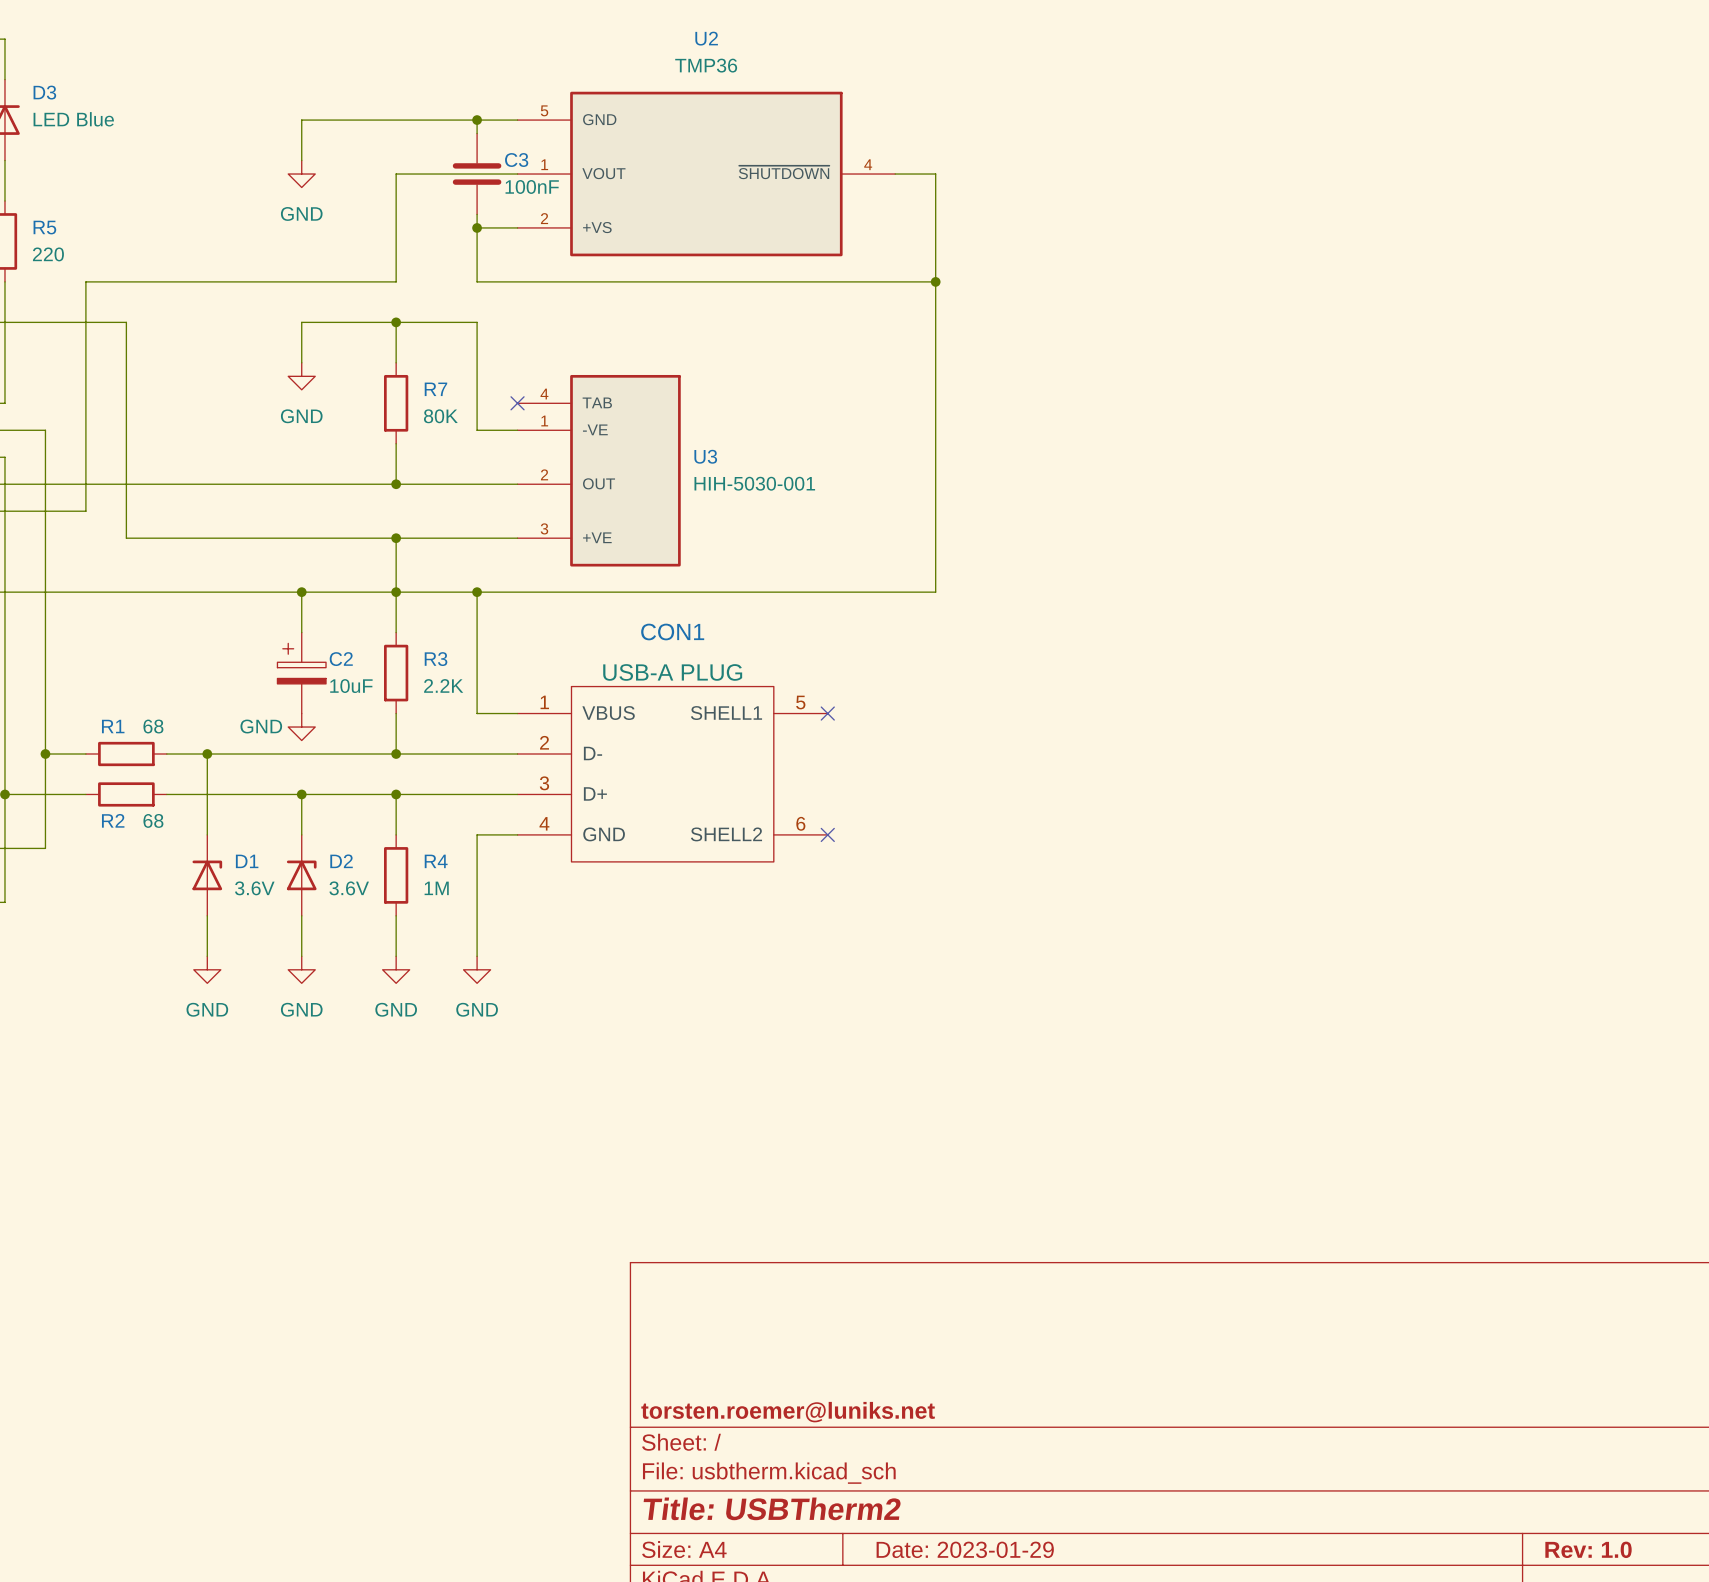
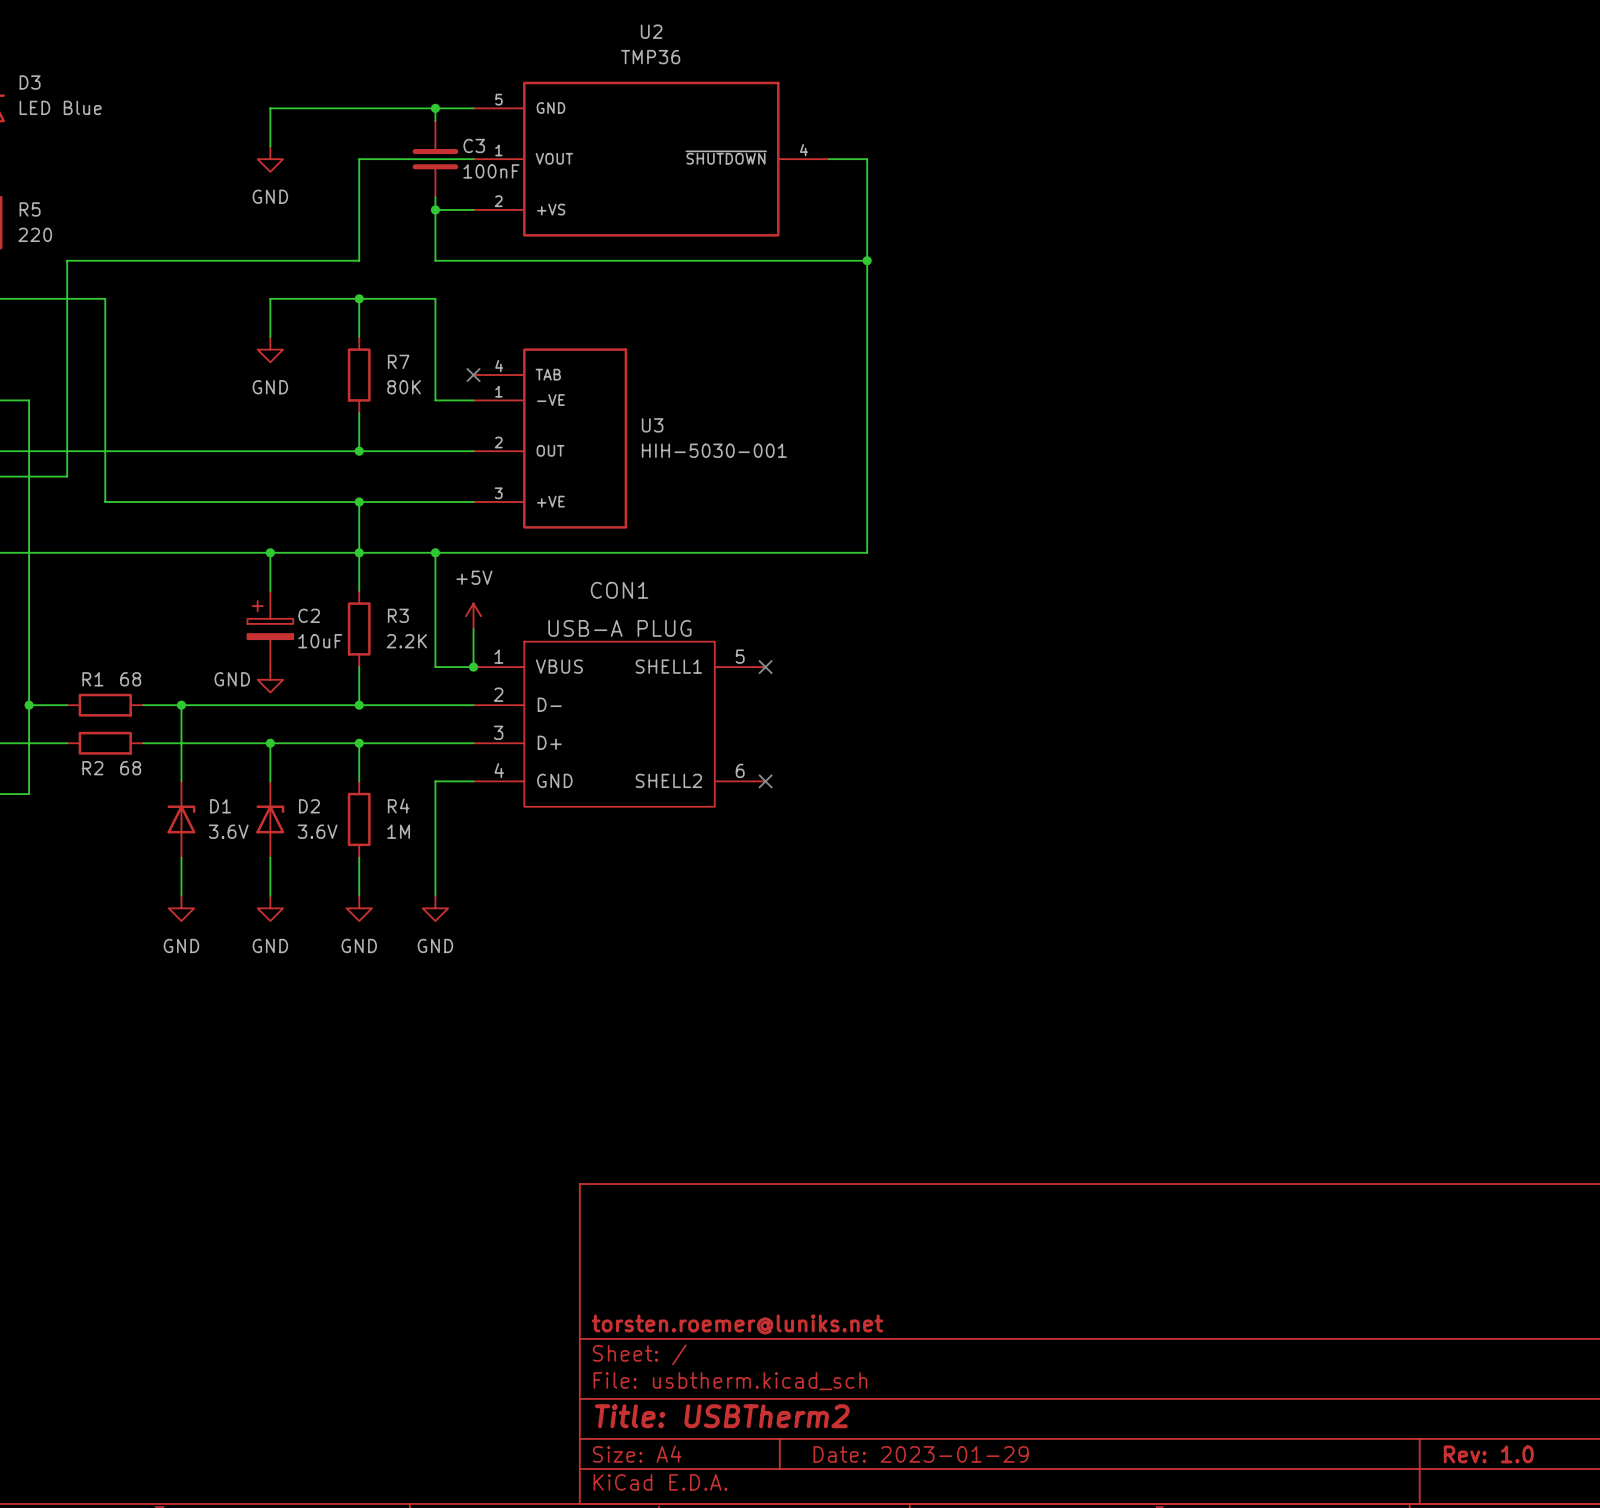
power symbol: none -> +5V (473, 616)
wire: none -> (473, 628) (473, 667)
junction: none -> (473, 667)

